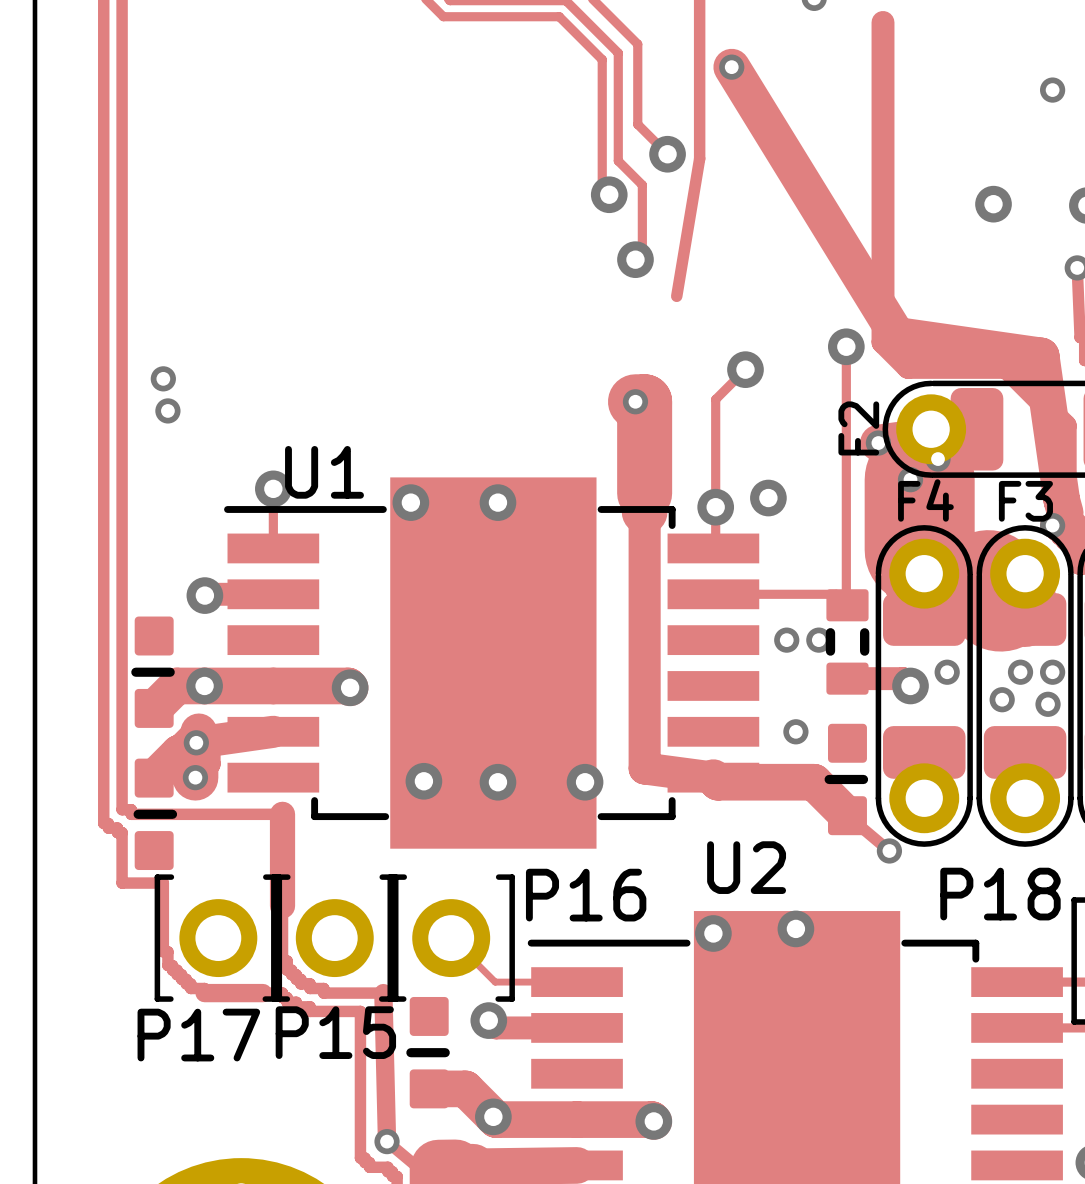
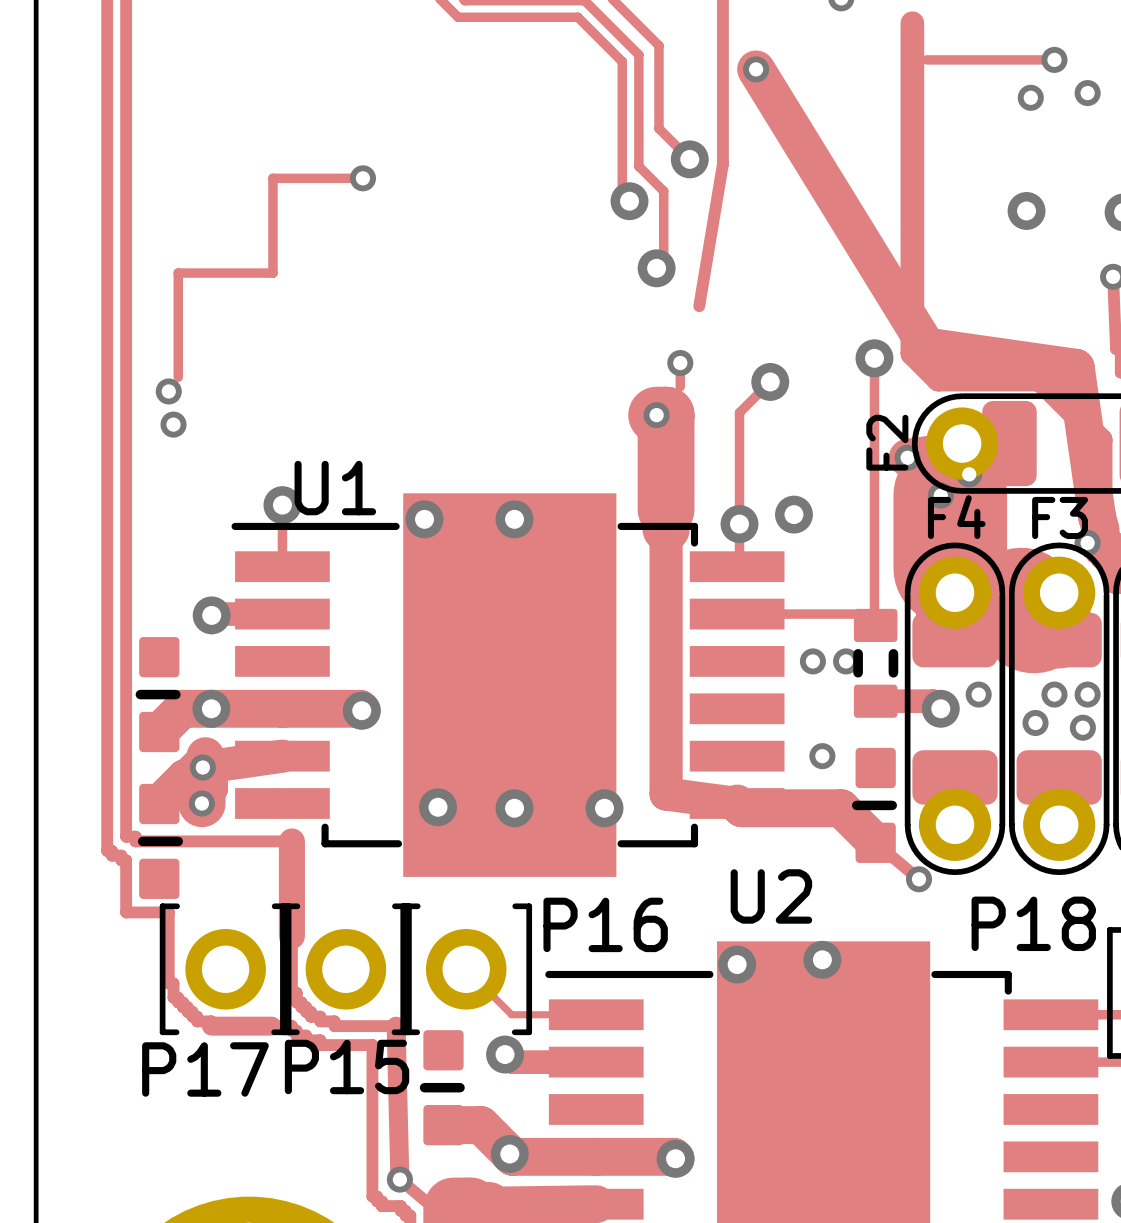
track: none -> (926, 59) (1054, 59)
via: none -> (1054, 59)
via: none -> (1030, 97)
track: none -> (362, 178) (272, 178) (272, 273) (178, 273) (178, 377)
via: none -> (362, 178)
track: none -> (680, 363) (680, 386)
via: none -> (680, 363)

